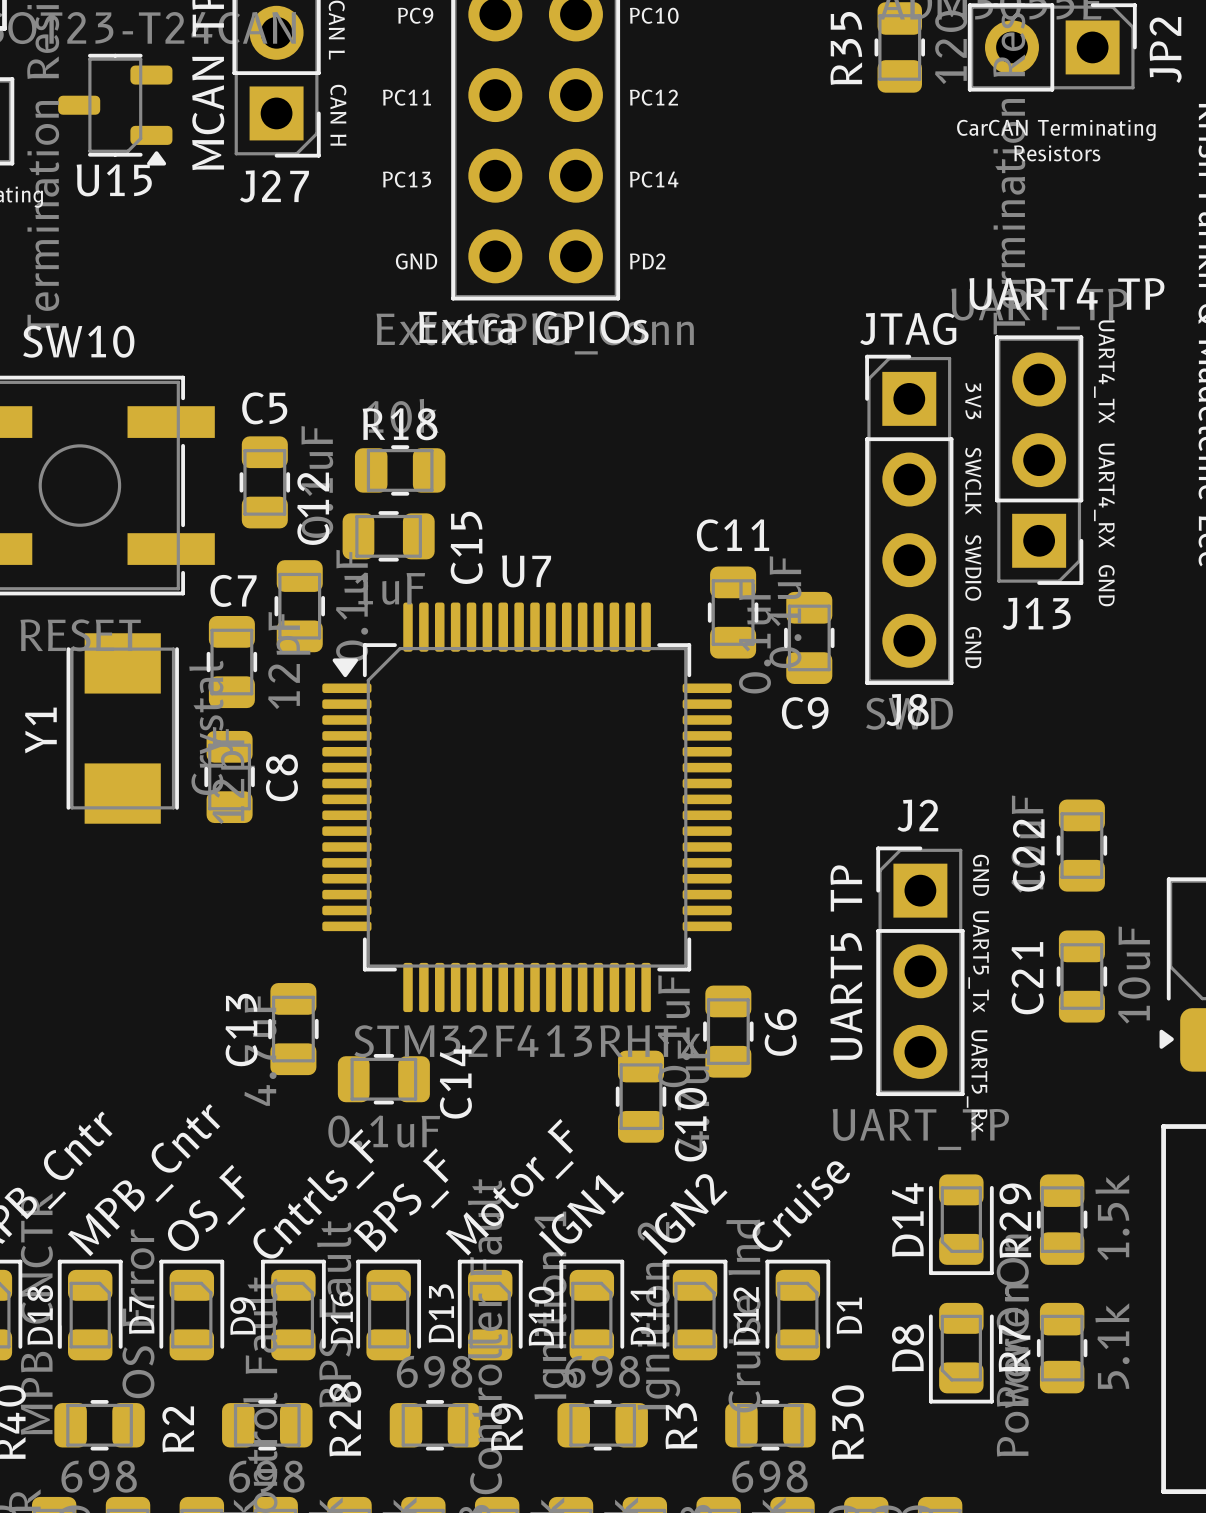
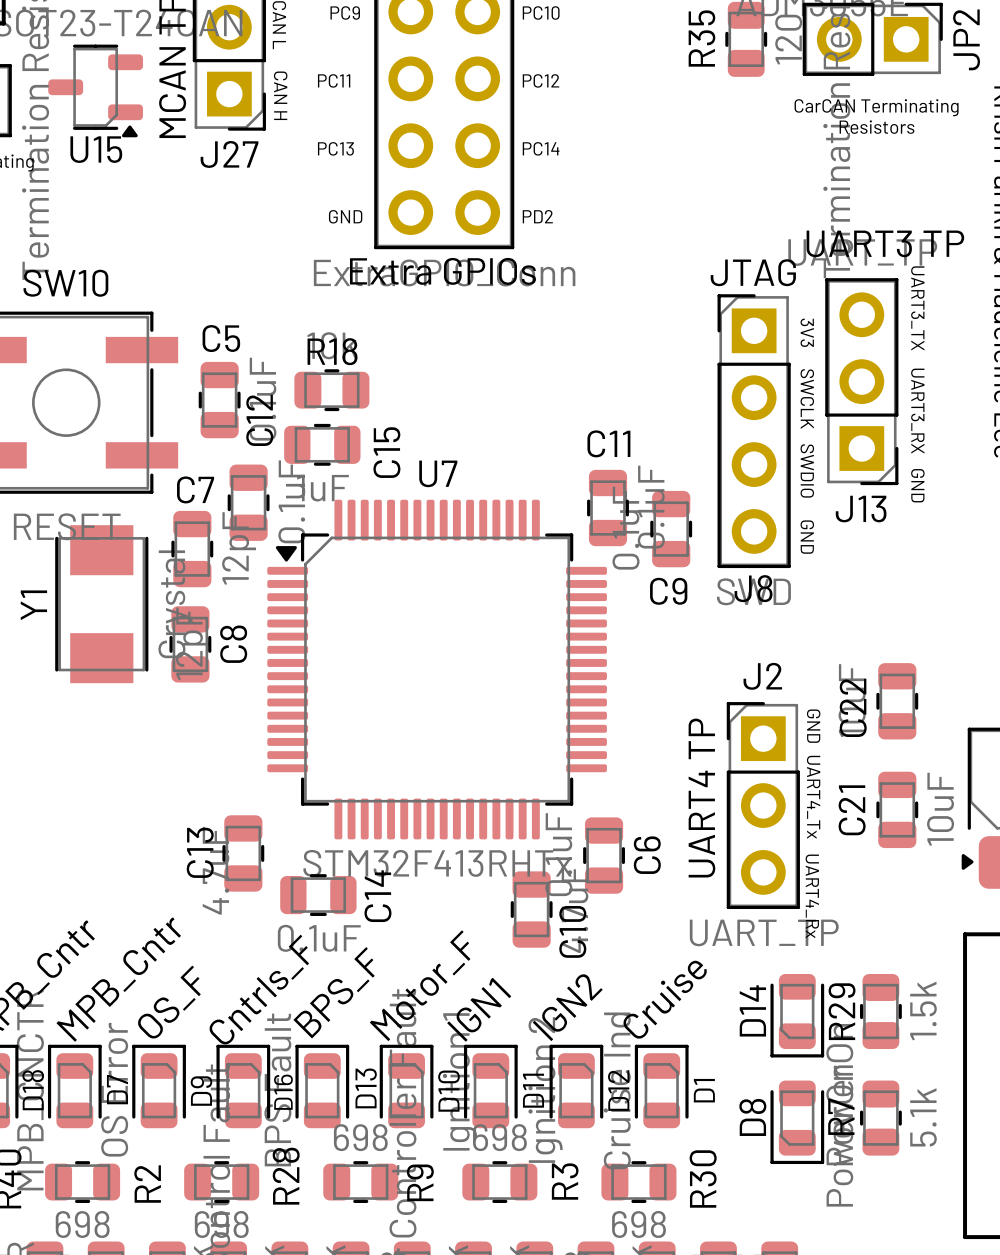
text: UART4 TP (1066, 294) -> UART3 TP (885, 243)
text: UART4_TX (1104, 371) -> UART3_TX (917, 308)
text: UART4_RX (1104, 495) -> UART3_RX (917, 411)
text: UART5_Tx (978, 961) -> UART4_Tx (813, 797)
text: UART5 TP (846, 962) -> UART4 TP (701, 798)
text: UART5_Rx (977, 1081) -> UART4_Rx (812, 896)

